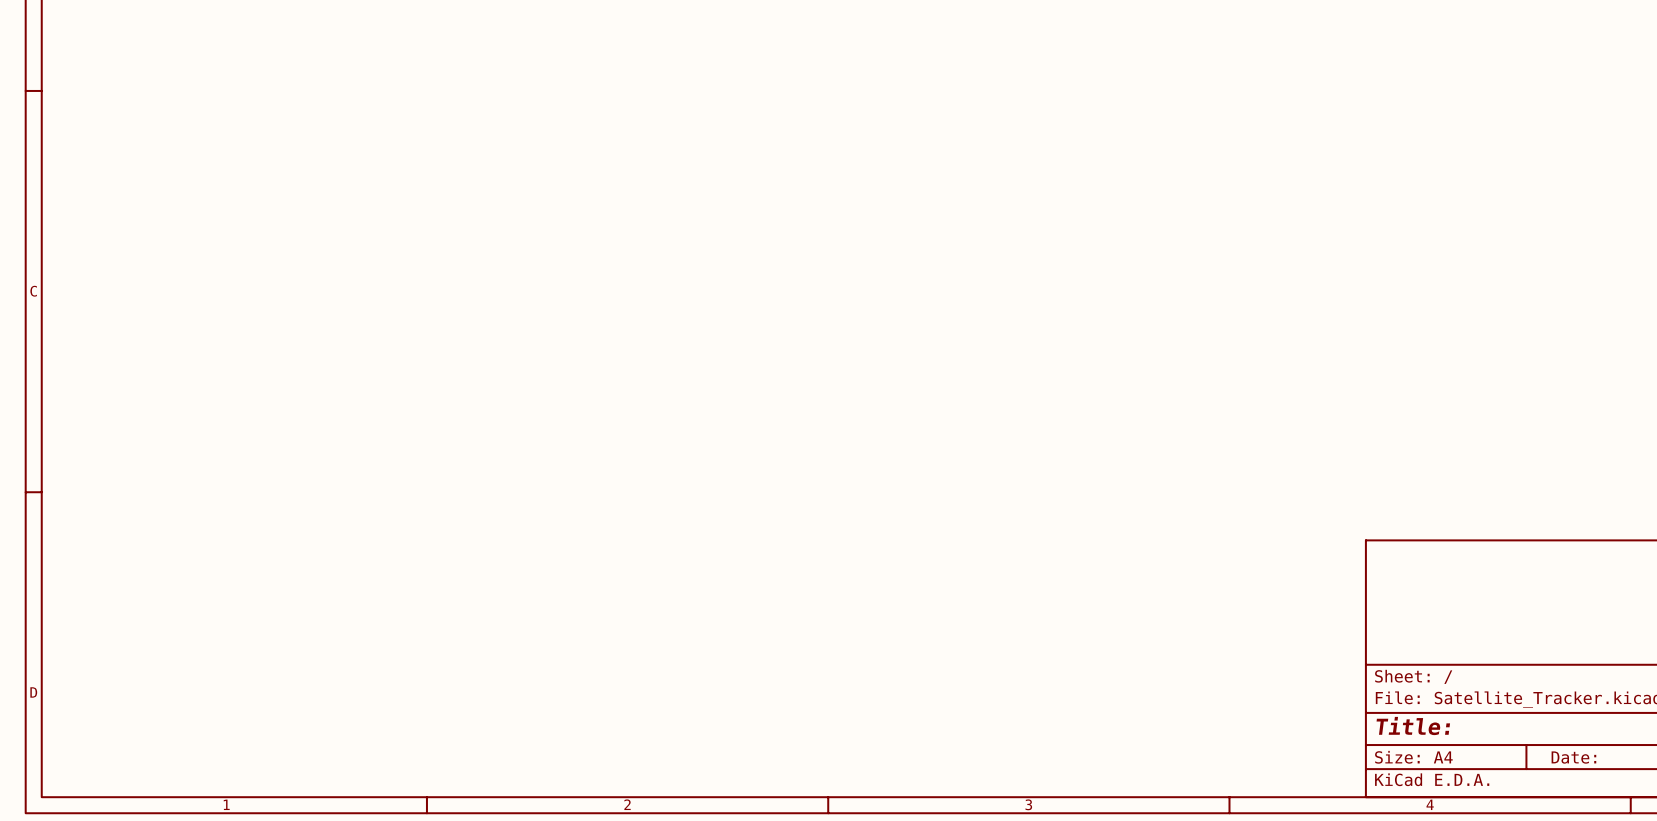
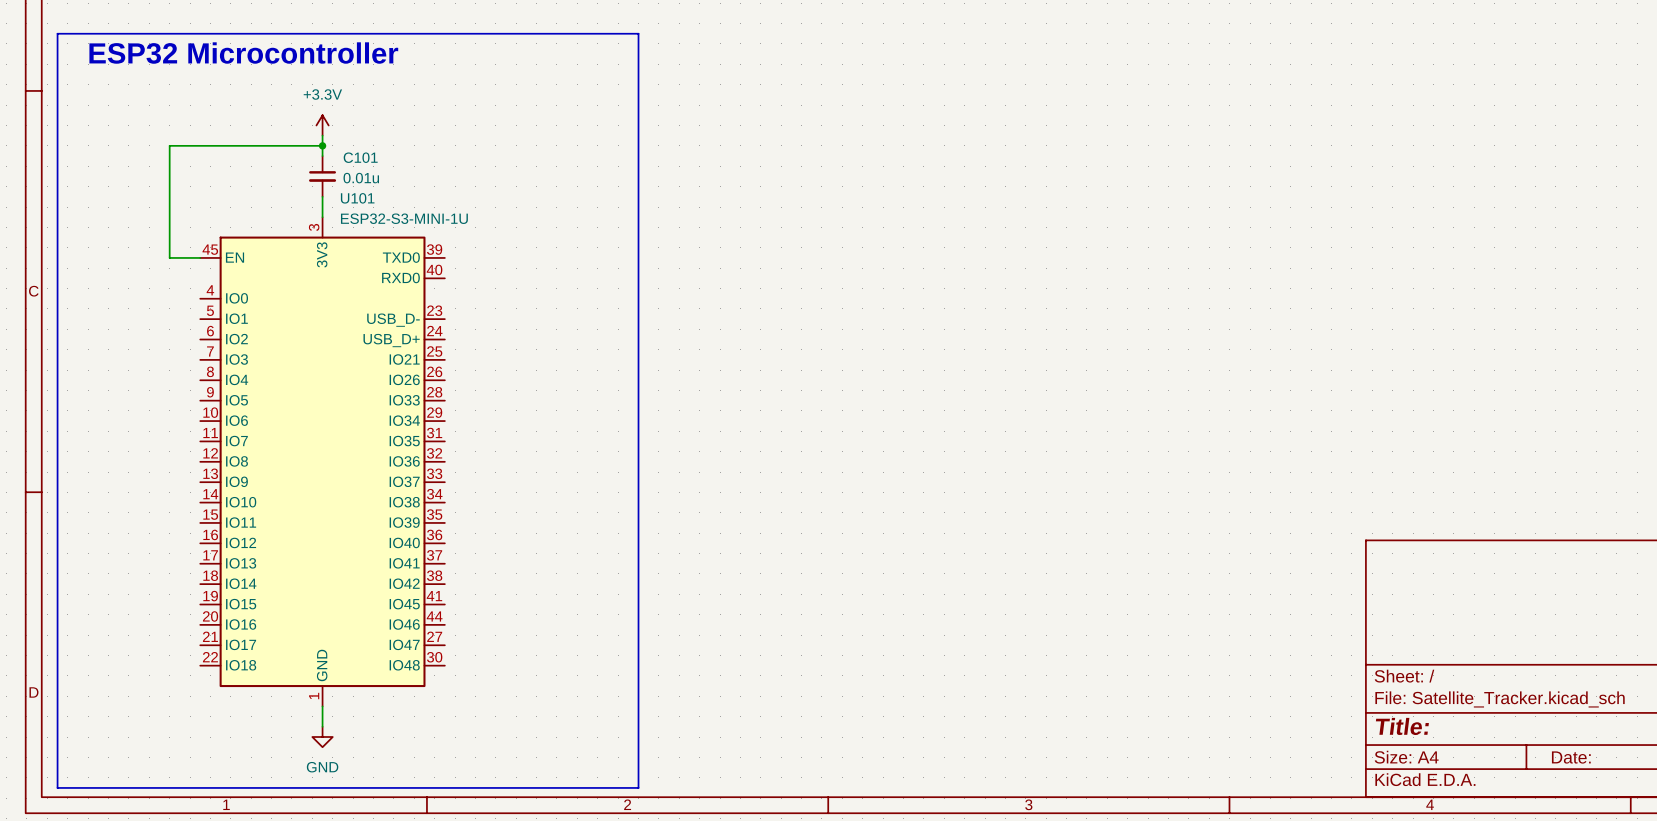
line: none -> (57, 33) (638, 33) (638, 787) (57, 787) (57, 33)
text: none -> ESP32 Microcontroller (243, 53)
power symbol: none -> +3.3V (322, 125)
wire: none -> (322, 135) (322, 156)
wire: none -> (322, 145) (169, 145) (169, 257) (200, 257)
junction: none -> (322, 145)
C101: none -> 0.01u (322, 176)
wire: none -> (322, 196) (322, 217)
U101: none -> ESP32-S3-MINI-1U (322, 461)
wire: none -> (322, 706) (322, 726)
power symbol: none -> GND (322, 737)

